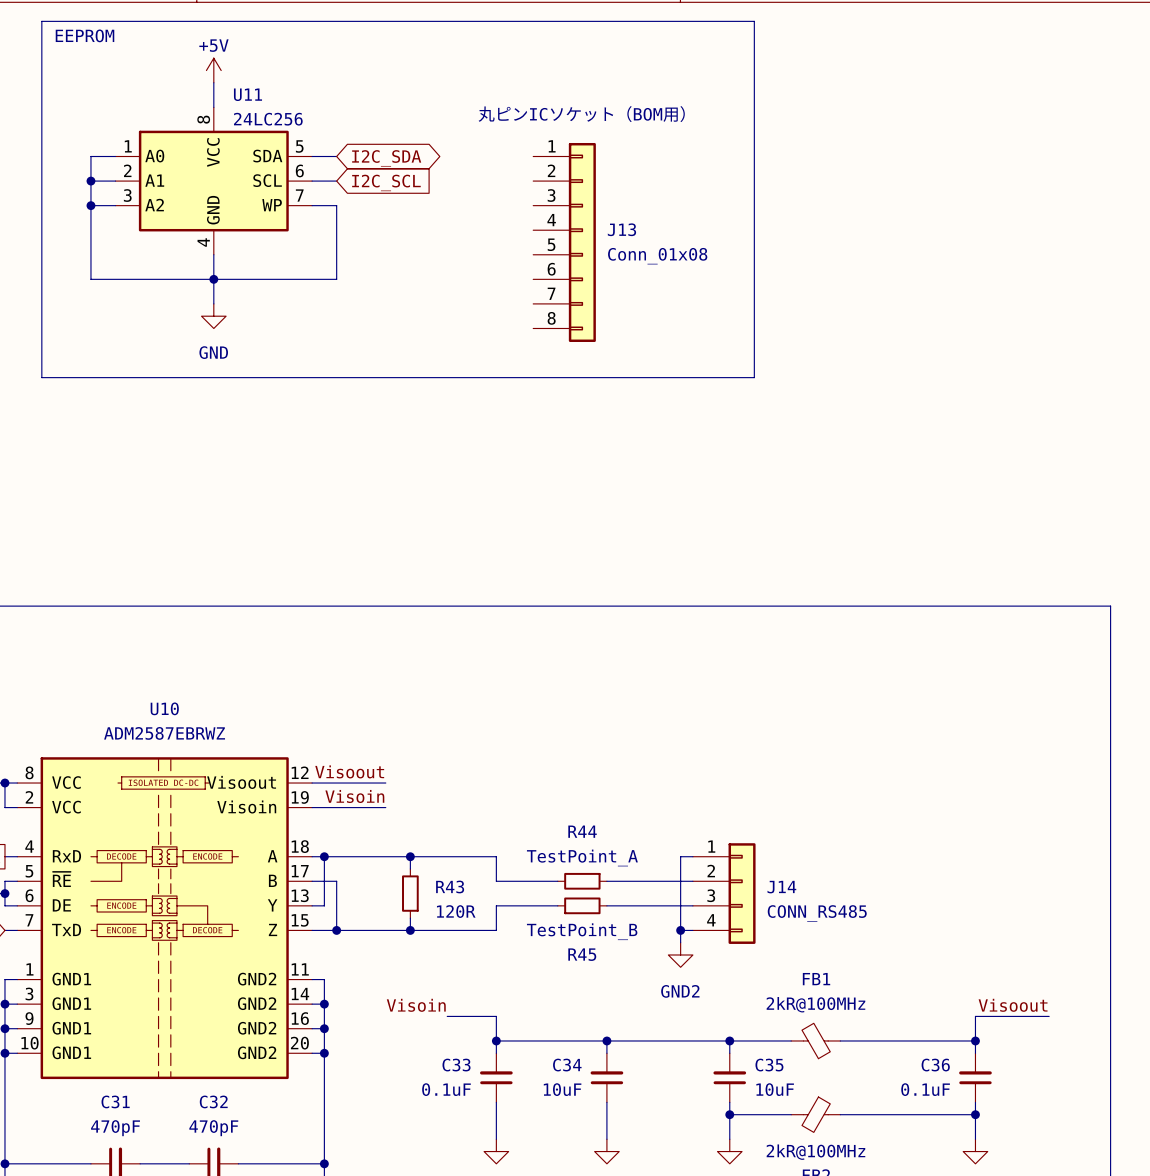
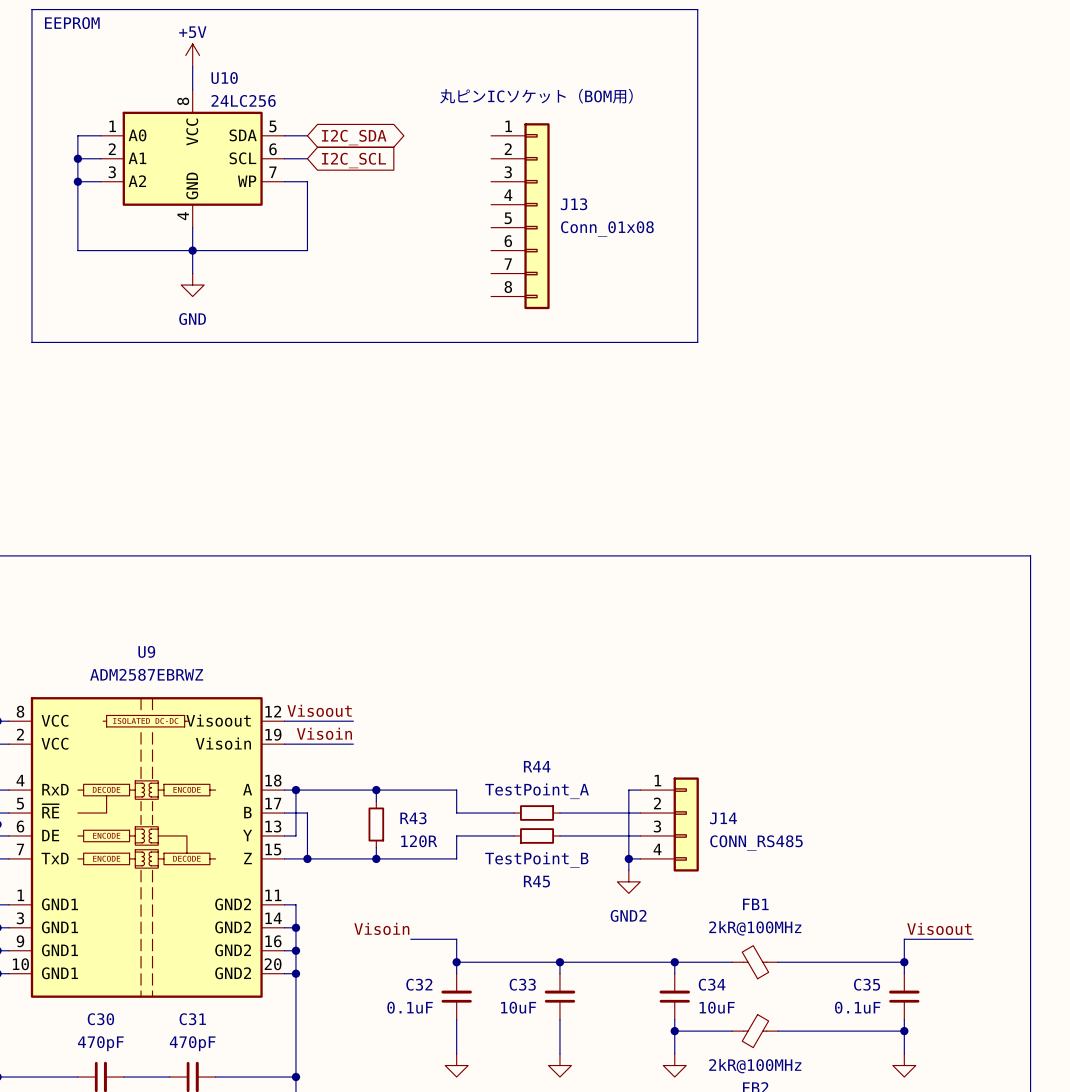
U11 name: U11 (247, 94) -> U10 (224, 78)
U10 name: U10 (164, 708) -> U9 (146, 651)
C33 name: C33 (456, 1065) -> C32 (419, 984)
C34 name: C34 (567, 1065) -> C33 (522, 984)
C35 name: C35 (769, 1065) -> C34 (712, 984)
C36 name: C36 (935, 1065) -> C35 (867, 984)
C31 name: C31 (115, 1101) -> C30 (100, 1019)
C32 name: C32 (213, 1101) -> C31 (192, 1019)

